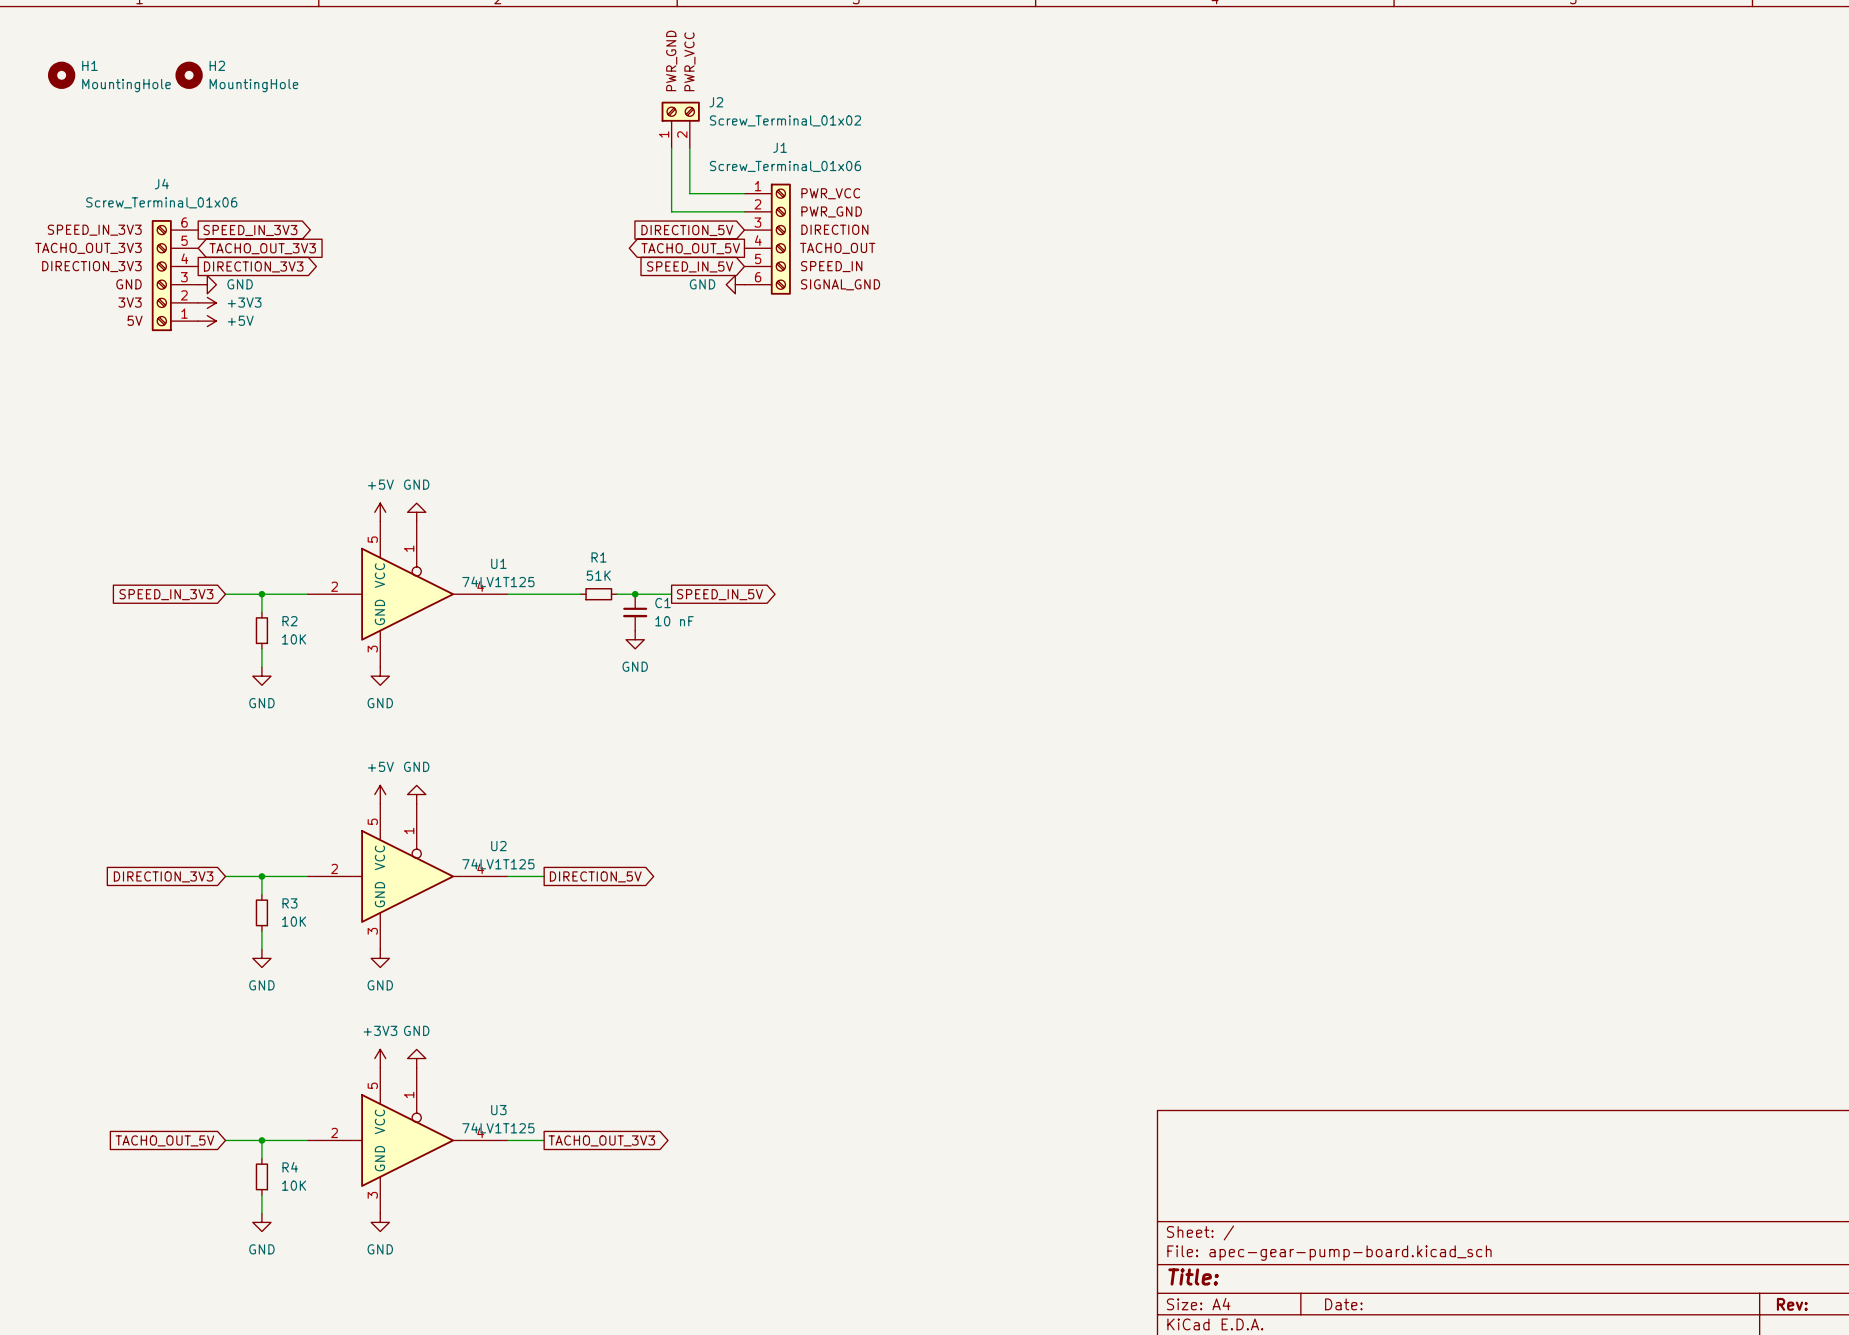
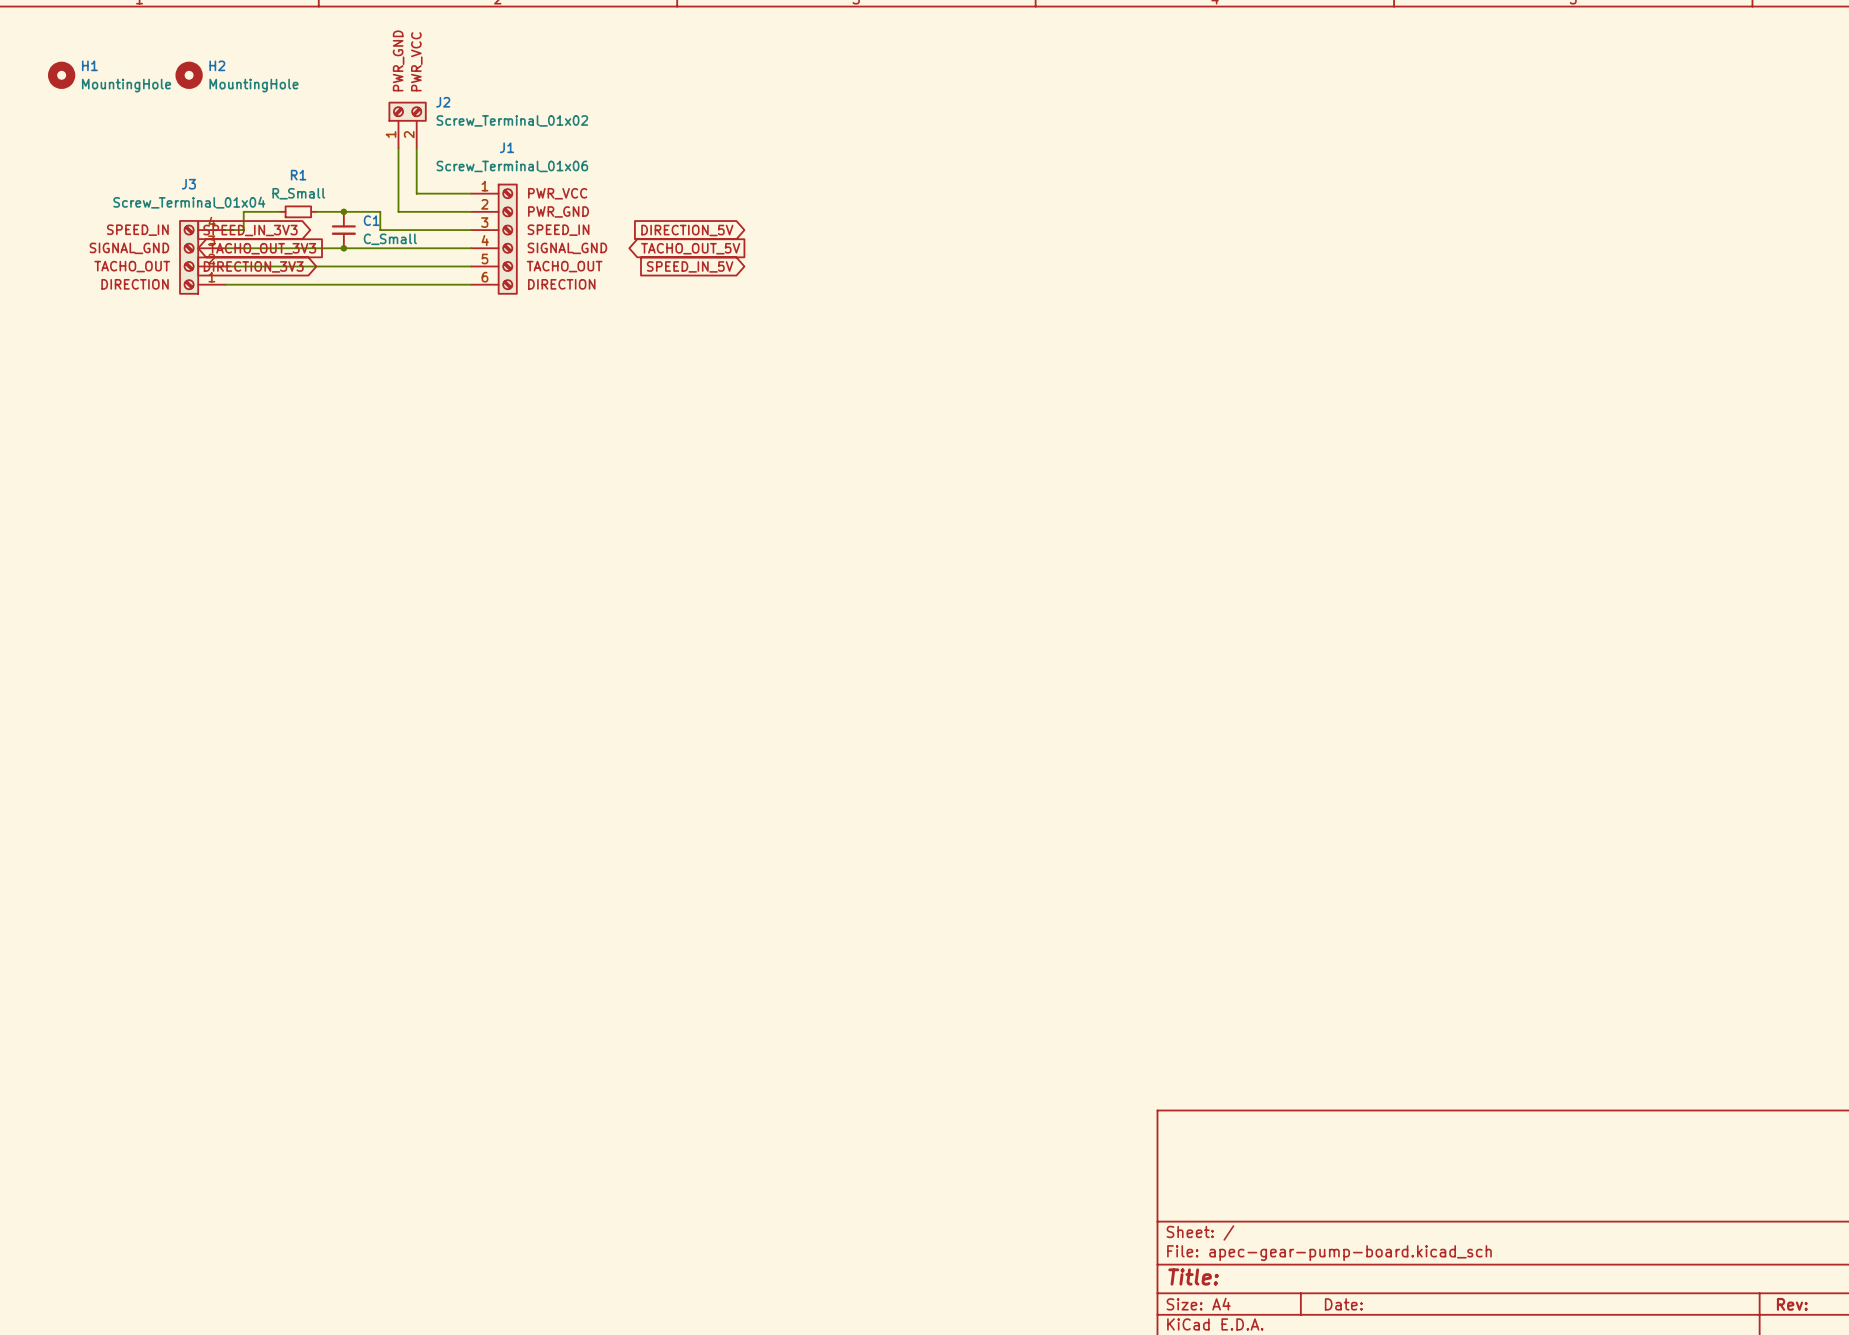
J2 position: (680, 124) -> (407, 124)
wire: none -> (398, 148) (398, 211) (471, 211)
wire: none -> (416, 148) (416, 193) (471, 193)
wire: (671, 148) (671, 211) (744, 211) -> none
wire: (689, 148) (689, 193) (744, 193) -> none
wire: none -> (280, 211) (243, 211) (243, 230) (225, 230)
wire: none -> (316, 211) (380, 211) (380, 230) (471, 230)
junction: none -> (343, 211)
J1 text: DIRECTION (834, 229) -> SPEED_IN (558, 230)
J1 position: (767, 239) -> (494, 239)
wire: none -> (225, 248) (471, 248)
junction: none -> (343, 248)
J1 text: TACHO_OUT (837, 248) -> SIGNAL_GND (567, 248)
J3: none -> Screw_Terminal_01x04 (202, 257)
wire: none -> (225, 266) (471, 266)
J1 text: SPEED_IN (831, 266) -> TACHO_OUT (564, 266)
J4: Screw_Terminal_01x06 (174, 275) -> none
power symbol: GND (207, 284) -> none
wire: none -> (225, 284) (471, 284)
power symbol: GND (735, 284) -> none
J1 text: SIGNAL_GND (840, 284) -> DIRECTION (561, 284)
power symbol: +3V3 (207, 302) -> none
power symbol: +5V (207, 321) -> none
power symbol: +5V (380, 512) -> none
power symbol: GND (416, 512) -> none
R1 value: 51K (598, 575) -> R_Small (298, 193)
global label: SPEED_IN_3V3 (166, 594) -> none
wire: (225, 594) (307, 594) -> none
wire: (261, 594) (261, 612) -> none
junction: (261, 594) -> none
U1: 74LV1T125 (407, 594) -> none
wire: (507, 594) (580, 594) -> none
R1 position: (598, 594) -> (298, 211)
wire: (616, 594) (671, 594) -> none
junction: (635, 594) -> none
global label: SPEED_IN_5V (719, 594) -> none
C1 position: (635, 612) -> (343, 230)
C1 value: 10 nF (674, 621) -> C_Small (390, 239)
R2: 10K (261, 630) -> none
power symbol: GND (635, 639) -> none
wire: (261, 648) (261, 667) -> none
power symbol: GND (261, 676) -> none
power symbol: GND (380, 676) -> none
power symbol: +5V (380, 794) -> none
power symbol: GND (416, 794) -> none
global label: DIRECTION_3V3 (163, 876) -> none
wire: (225, 876) (307, 876) -> none
wire: (261, 876) (261, 894) -> none
junction: (261, 876) -> none
U2: 74LV1T125 (407, 876) -> none
wire: (507, 876) (544, 876) -> none
global label: DIRECTION_5V (595, 876) -> none
R3: 10K (261, 912) -> none
wire: (261, 931) (261, 949) -> none
power symbol: GND (261, 958) -> none
power symbol: GND (380, 958) -> none
power symbol: +3V3 (380, 1058) -> none
power symbol: GND (416, 1058) -> none
global label: TACHO_OUT_5V (164, 1140) -> none
wire: (225, 1140) (307, 1140) -> none
wire: (261, 1140) (261, 1158) -> none
junction: (261, 1140) -> none
U3: 74LV1T125 (407, 1140) -> none
wire: (507, 1140) (544, 1140) -> none
global label: TACHO_OUT_3V3 (601, 1140) -> none
R4: 10K (261, 1176) -> none
wire: (261, 1195) (261, 1213) -> none
power symbol: GND (261, 1222) -> none
power symbol: GND (380, 1222) -> none

